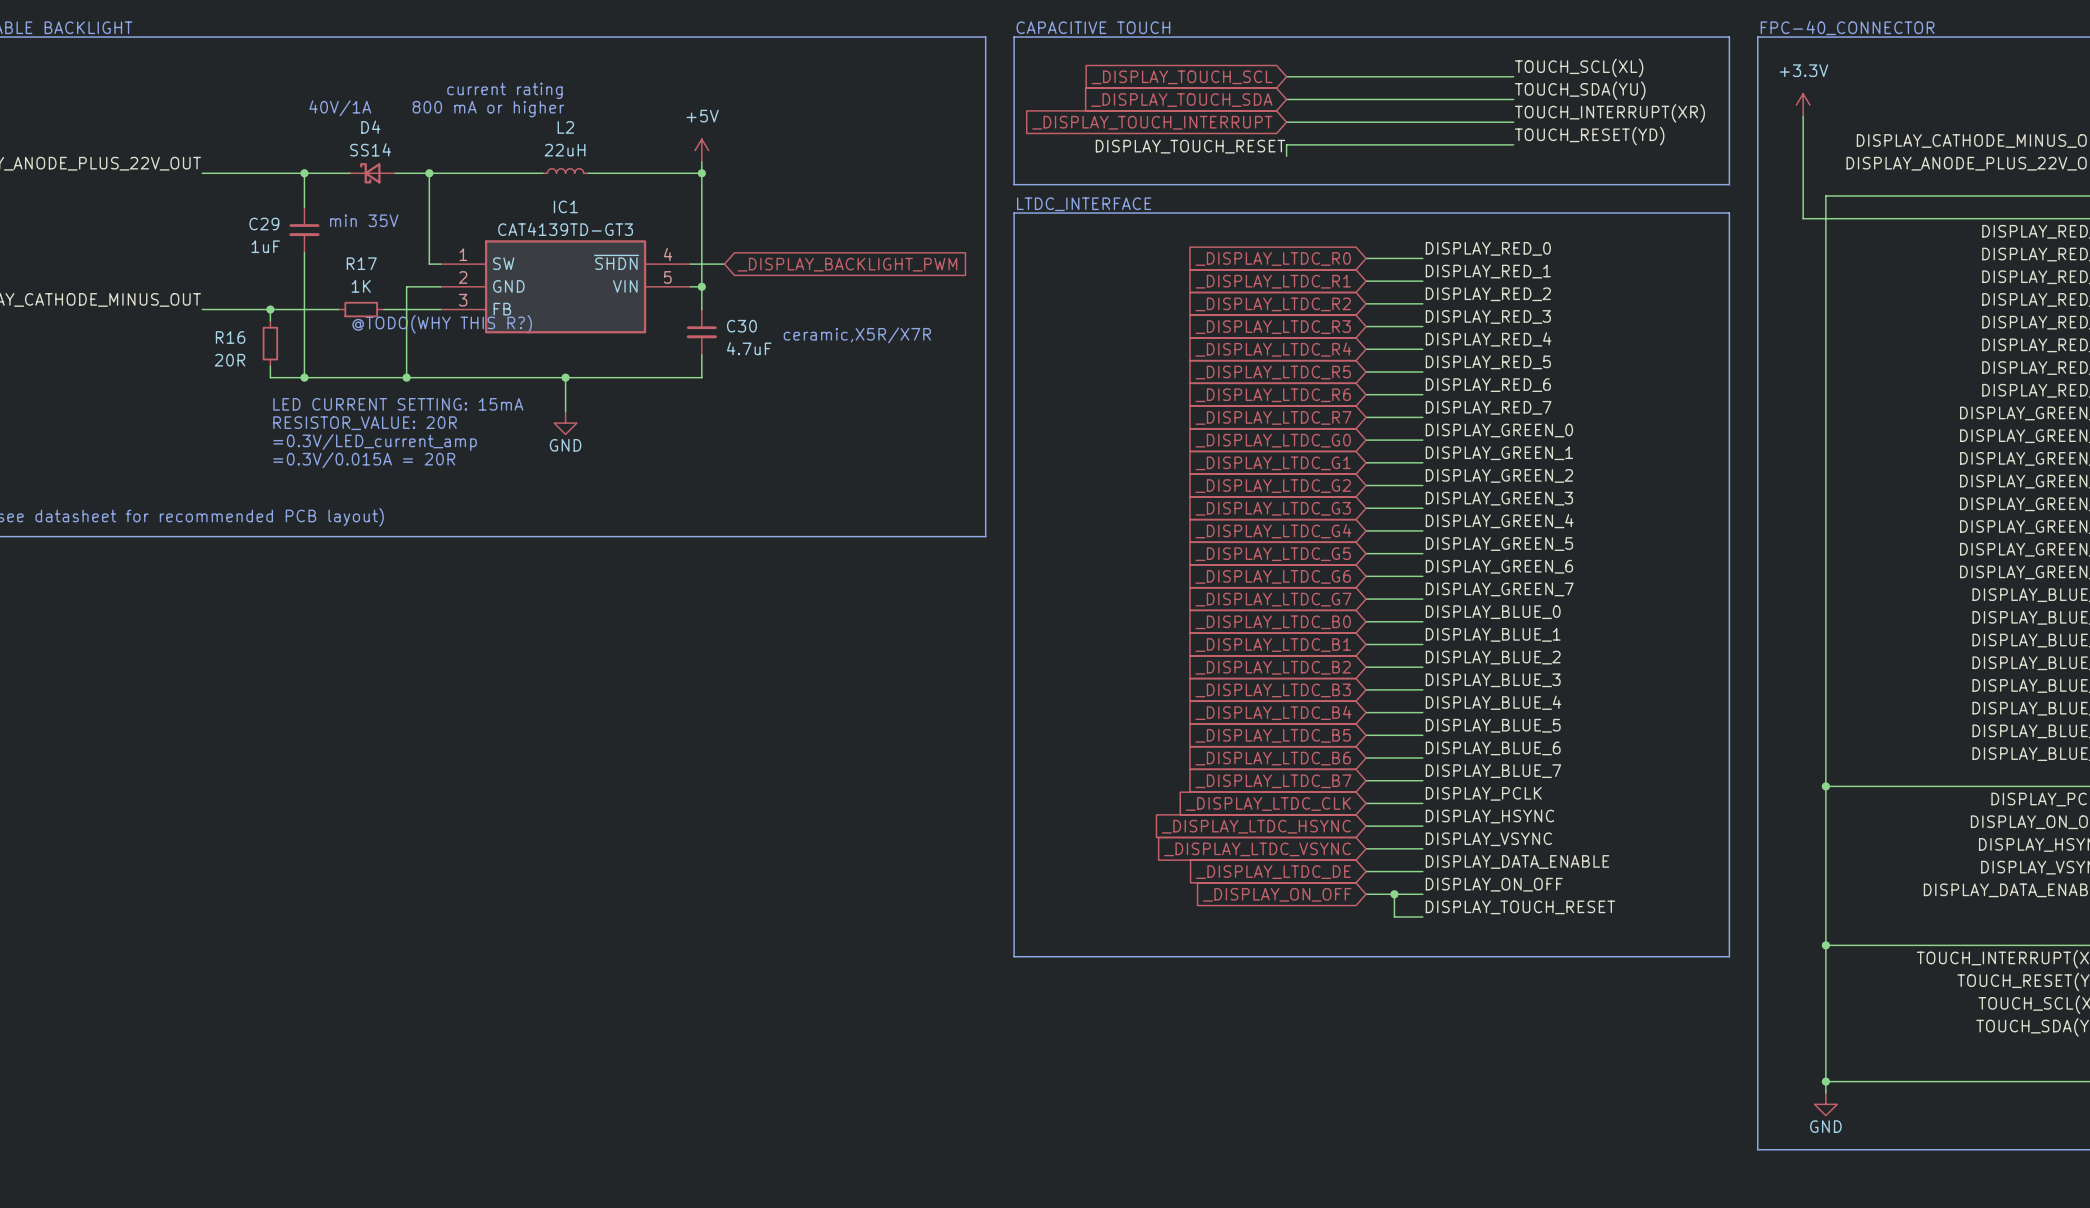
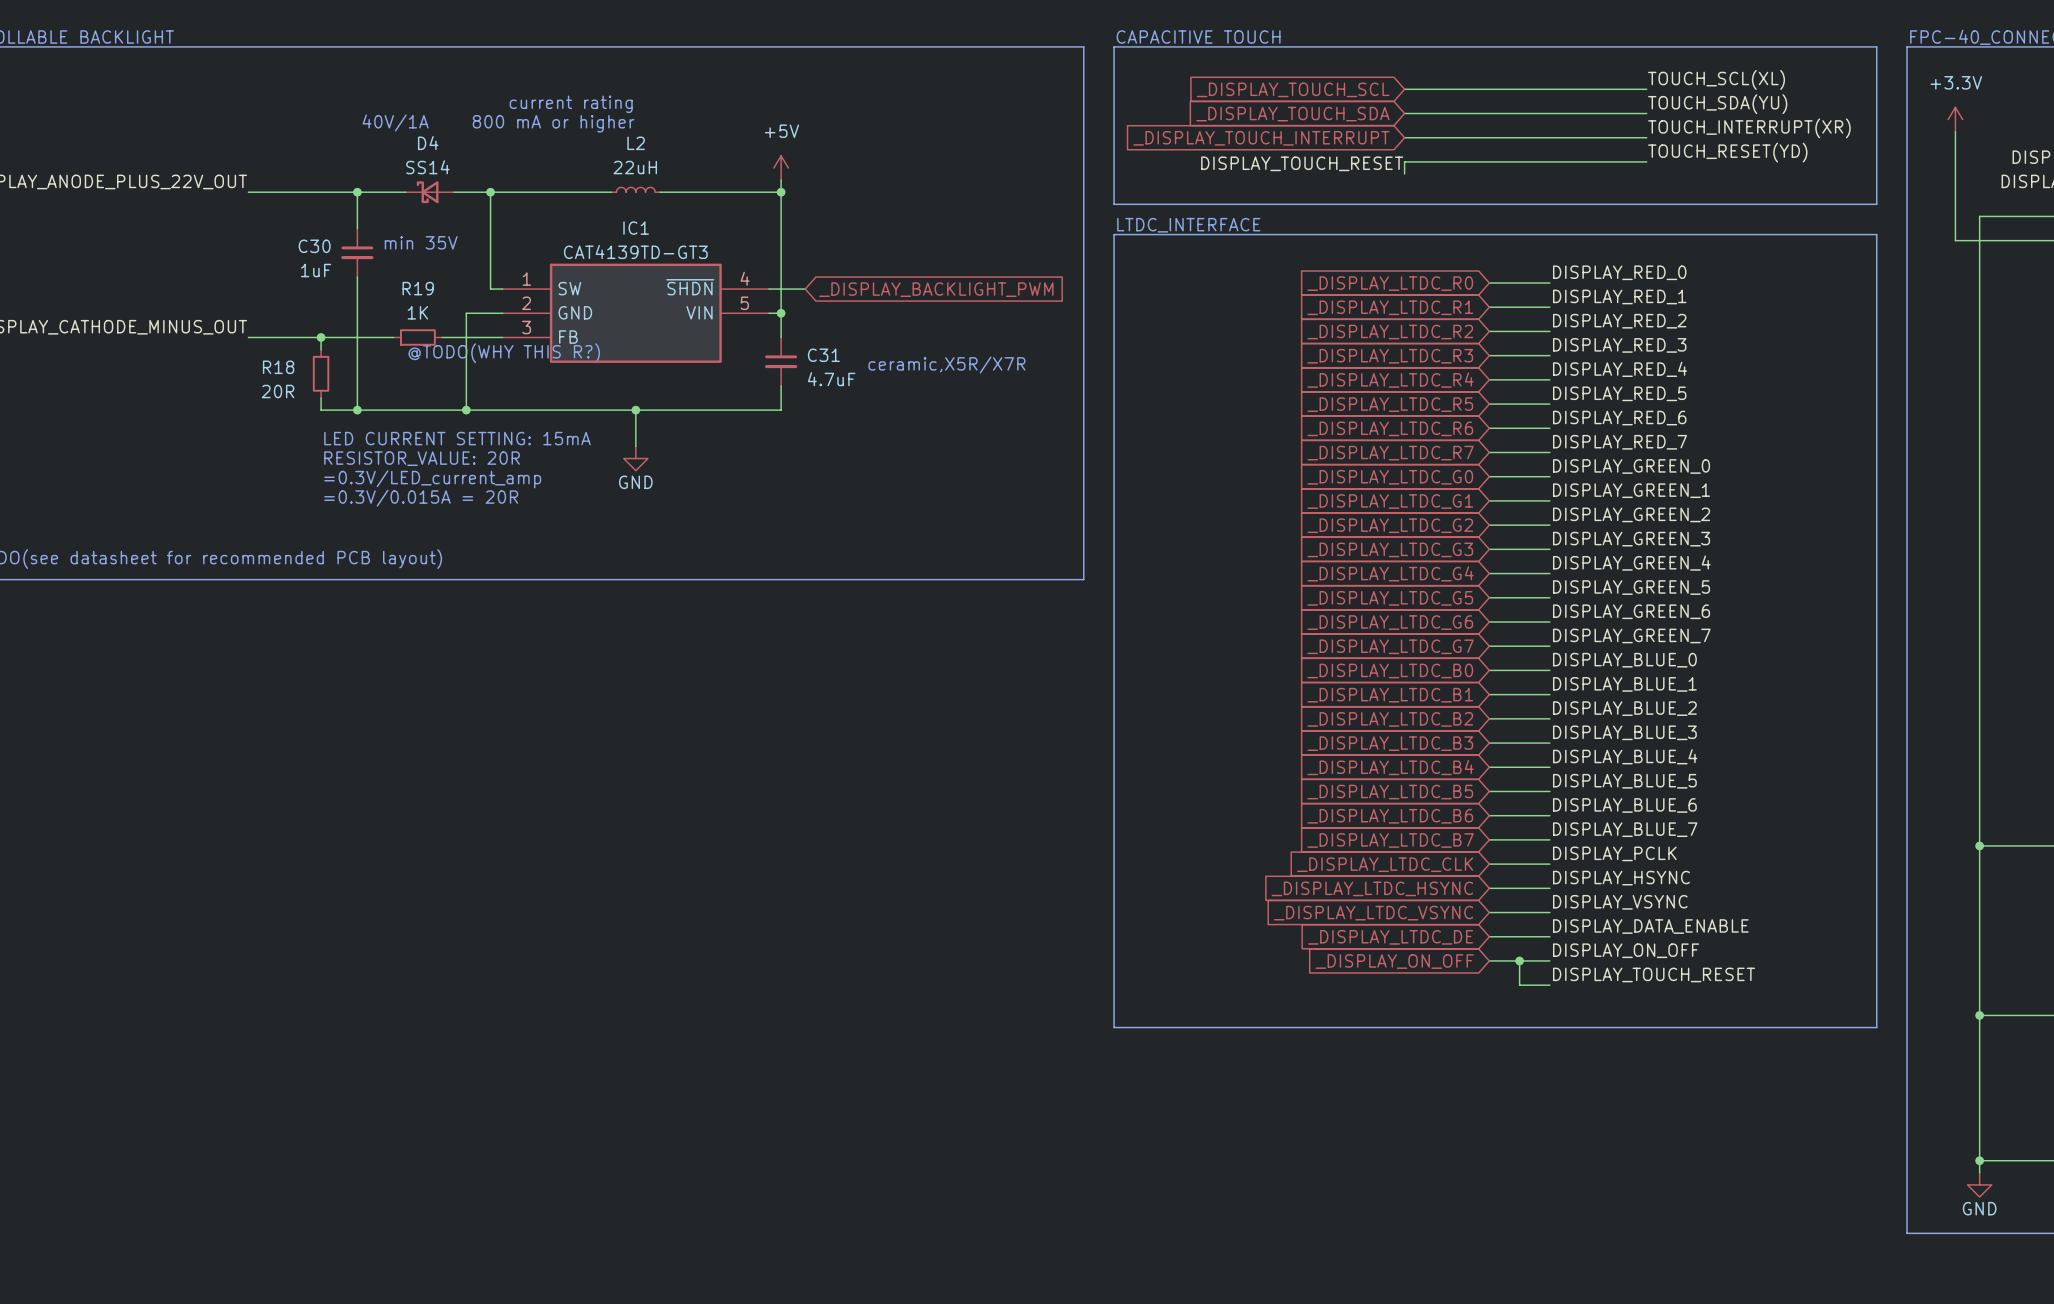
C29 name: C29 (264, 224) -> C30 (314, 246)
R17 name: R17 (361, 263) -> R19 (418, 288)
C30 name: C30 (741, 326) -> C31 (823, 355)
R16 name: R16 (230, 337) -> R18 (278, 367)

